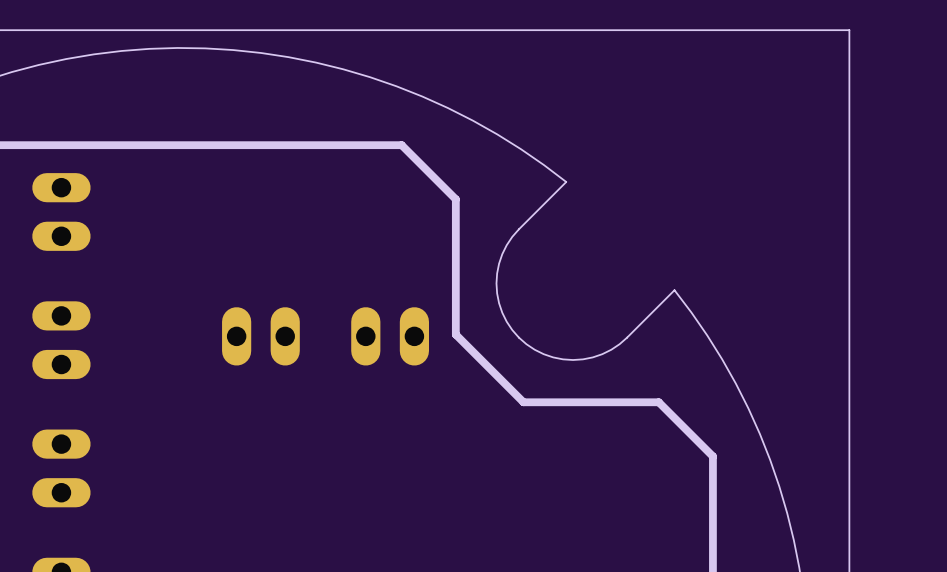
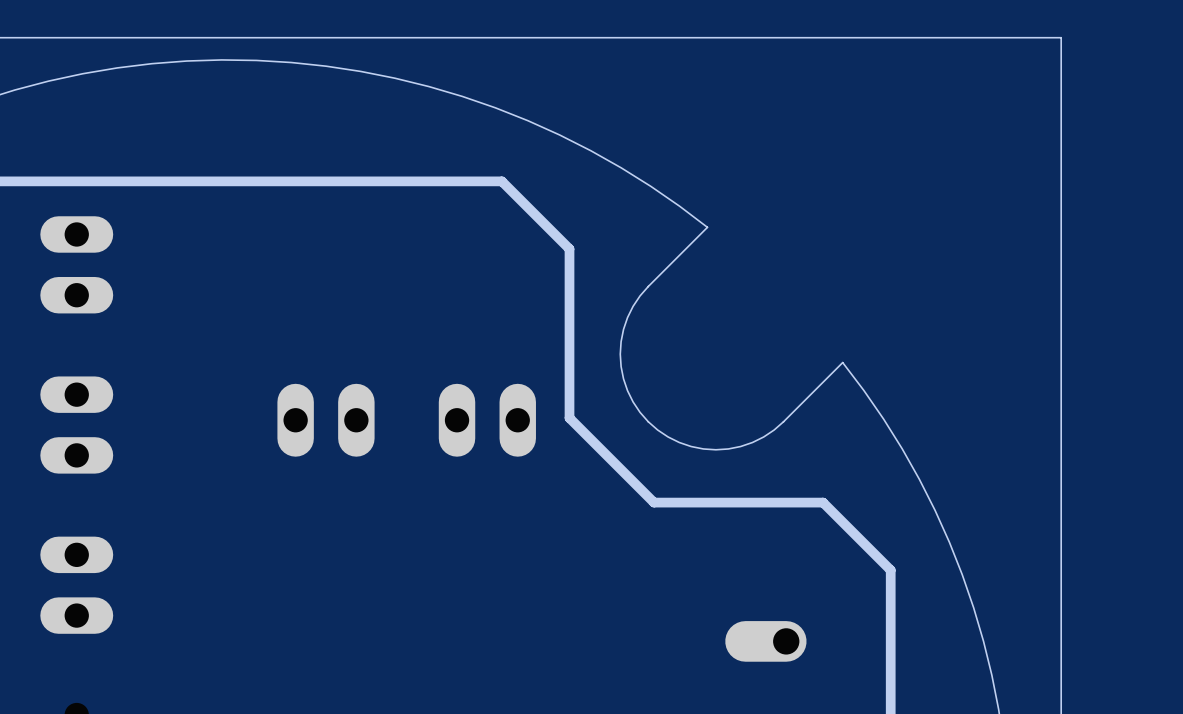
part: none -> (765, 641)

